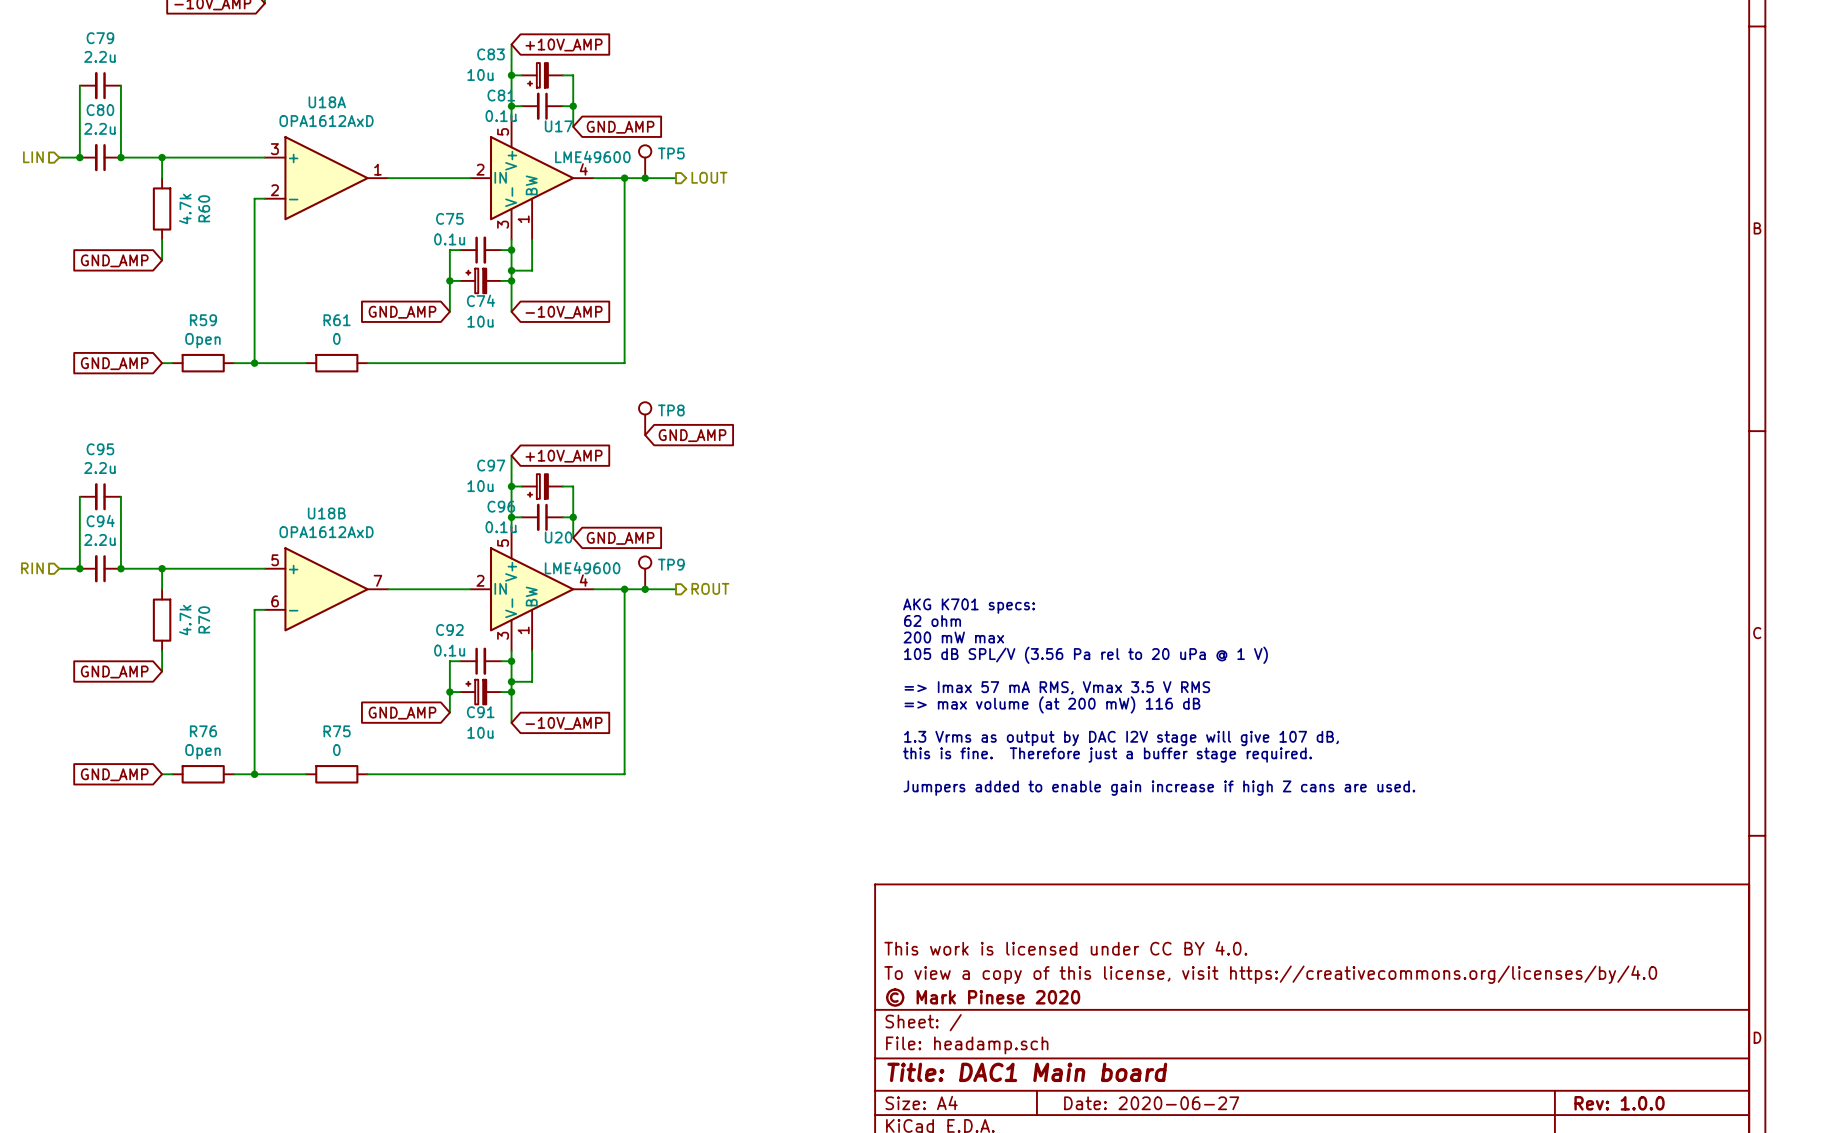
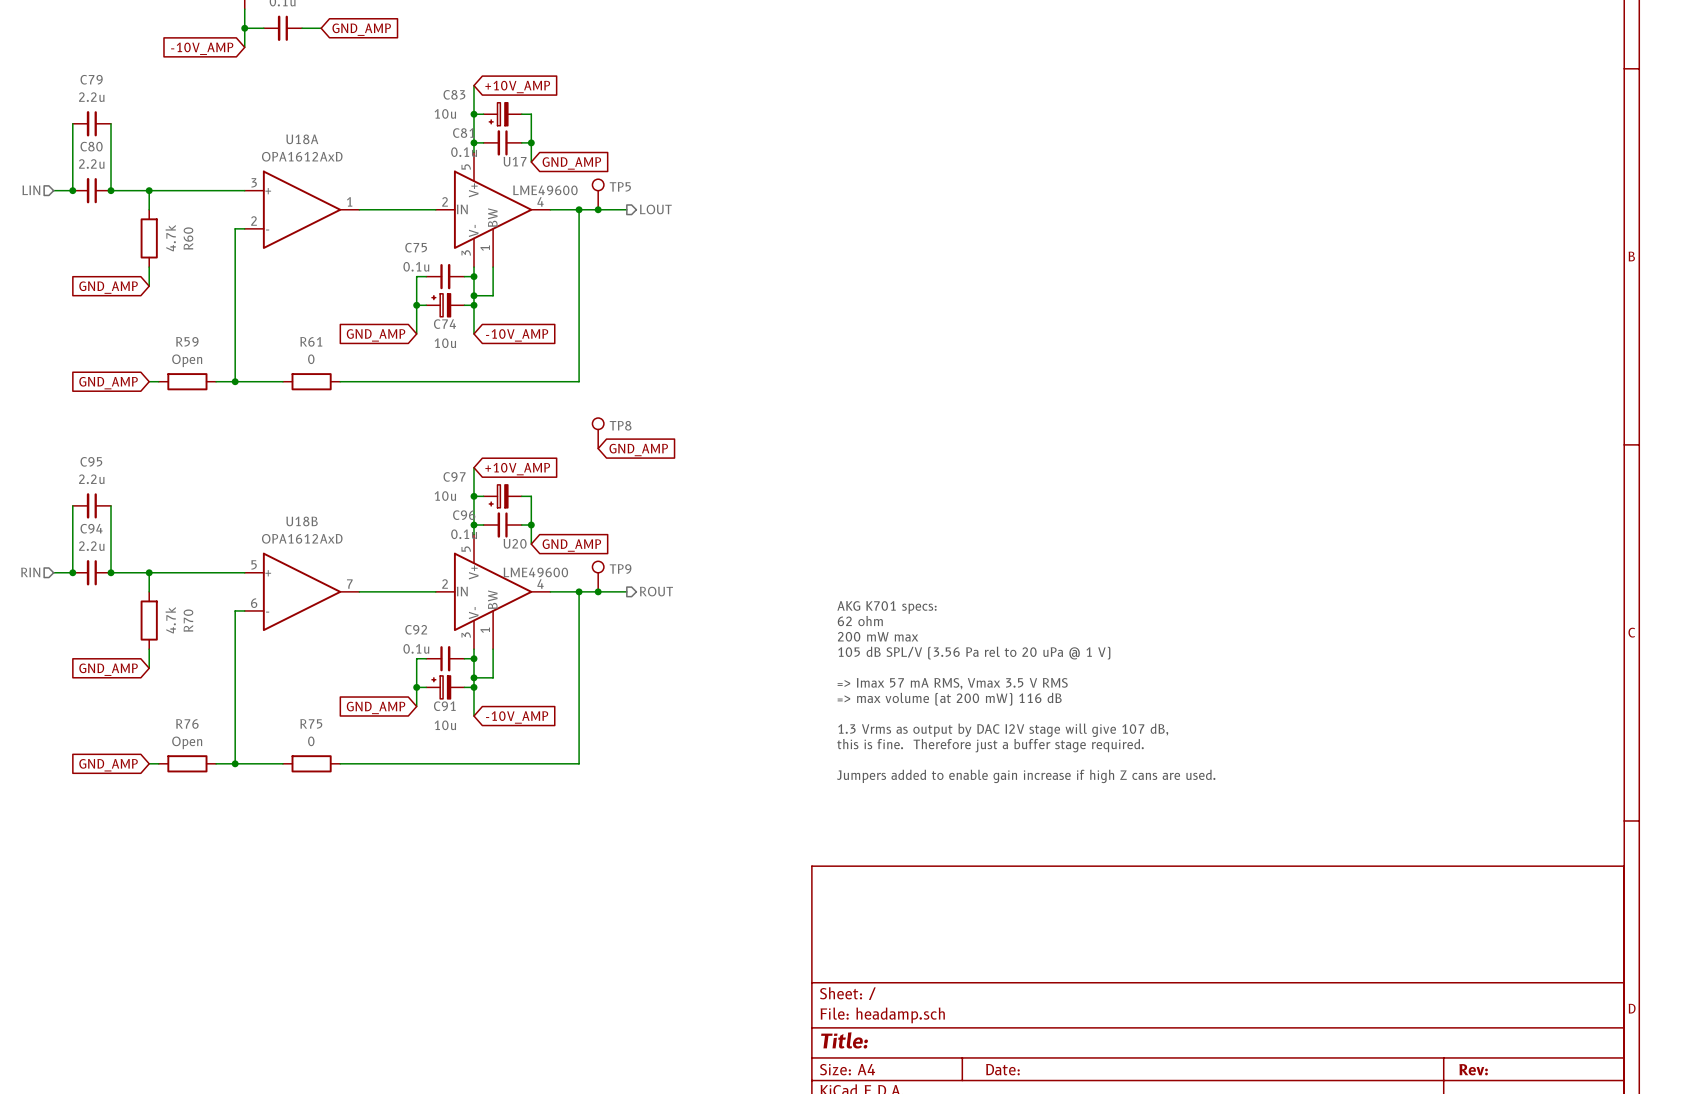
title block: This work is licensed under CC BY 4.0. (1065, 948) -> none
title block: To view a copy of this license, visit https://creativecommons.org/licenses/by/4.0 (1270, 974) -> none
title block: © Mark Pinese 2020 (983, 997) -> none
title block: Title: DAC1 Main board (1027, 1072) -> Title: (844, 1040)
title block: Date: 2020-06-27 (1151, 1103) -> Date: (1002, 1069)
title block: Rev: 1.0.0 (1619, 1103) -> Rev: (1473, 1069)

